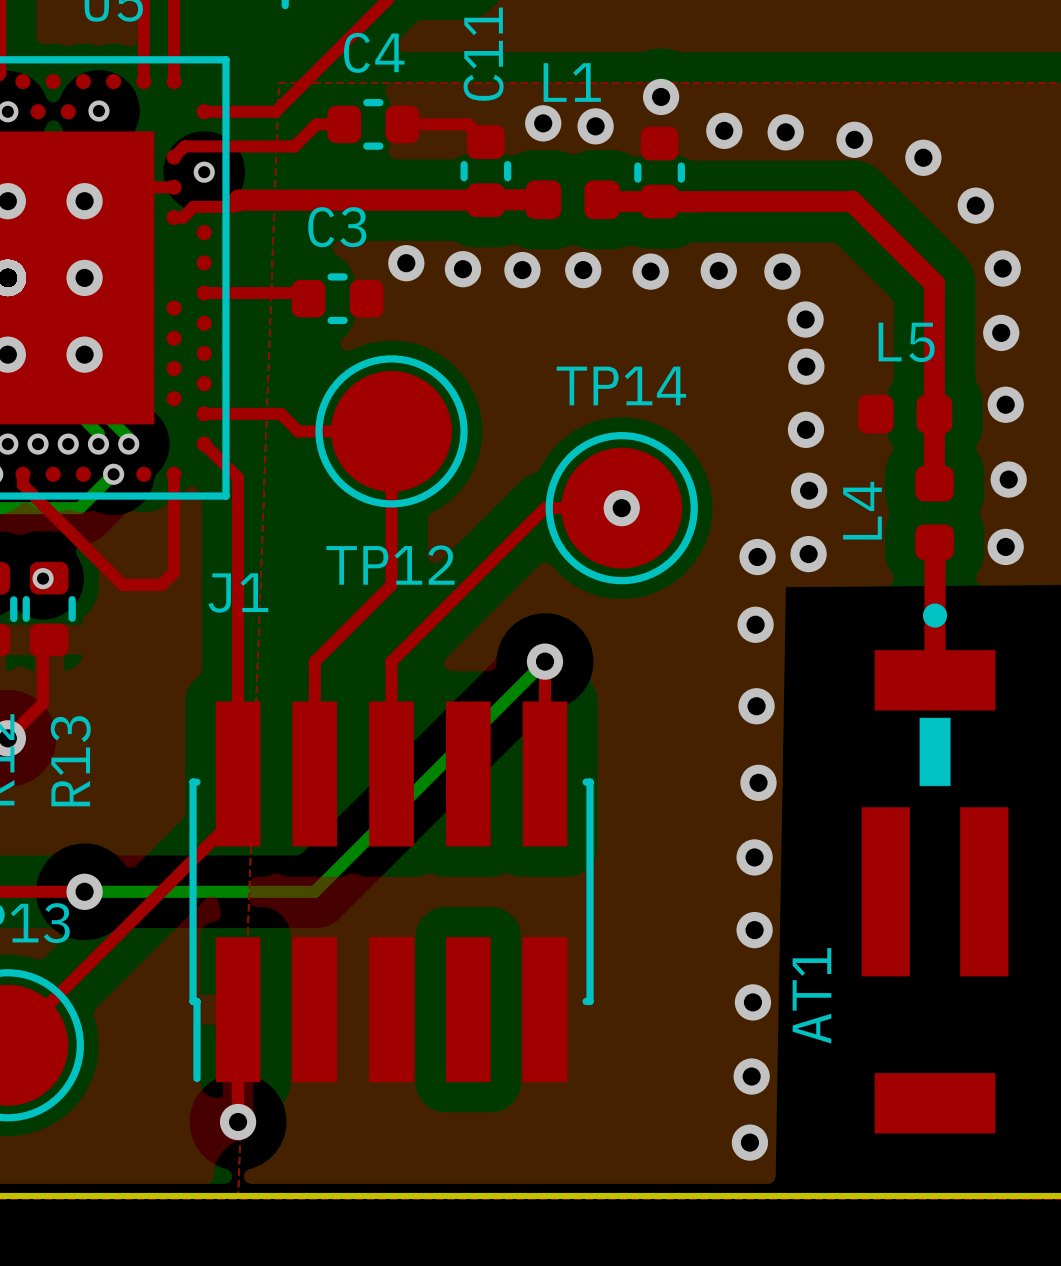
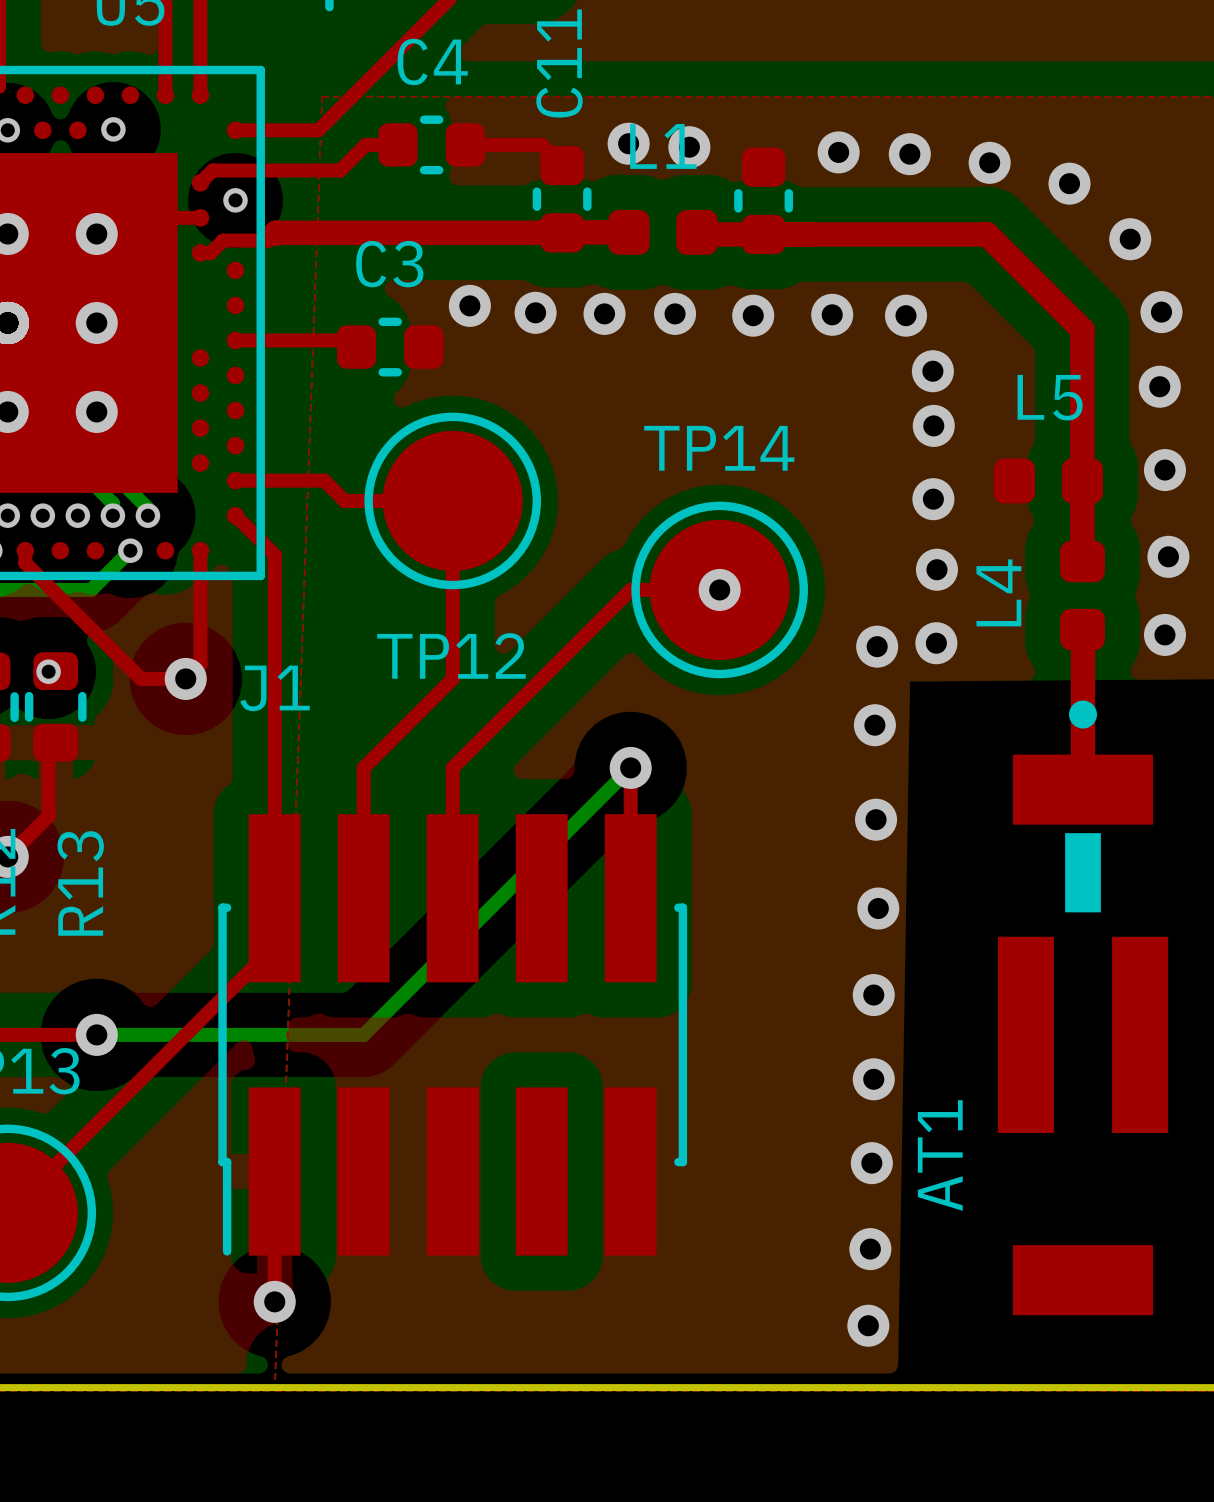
L1 name position: L1 (572, 82) -> L1 (663, 146)
via: (661, 96) -> none
via: none -> (185, 678)

